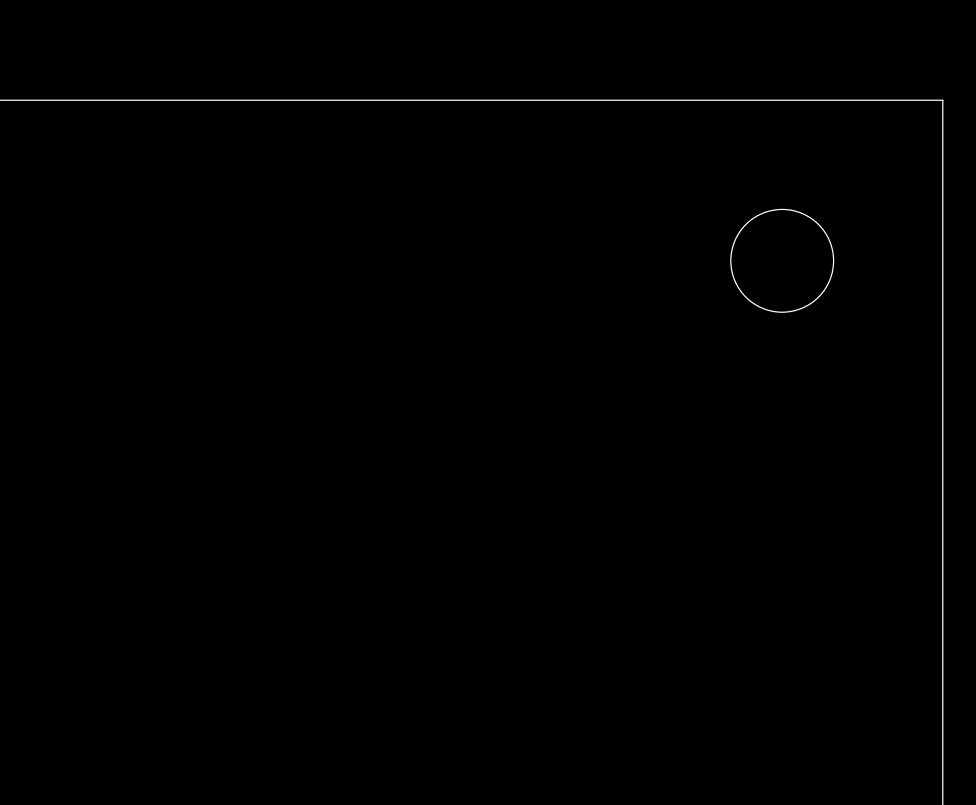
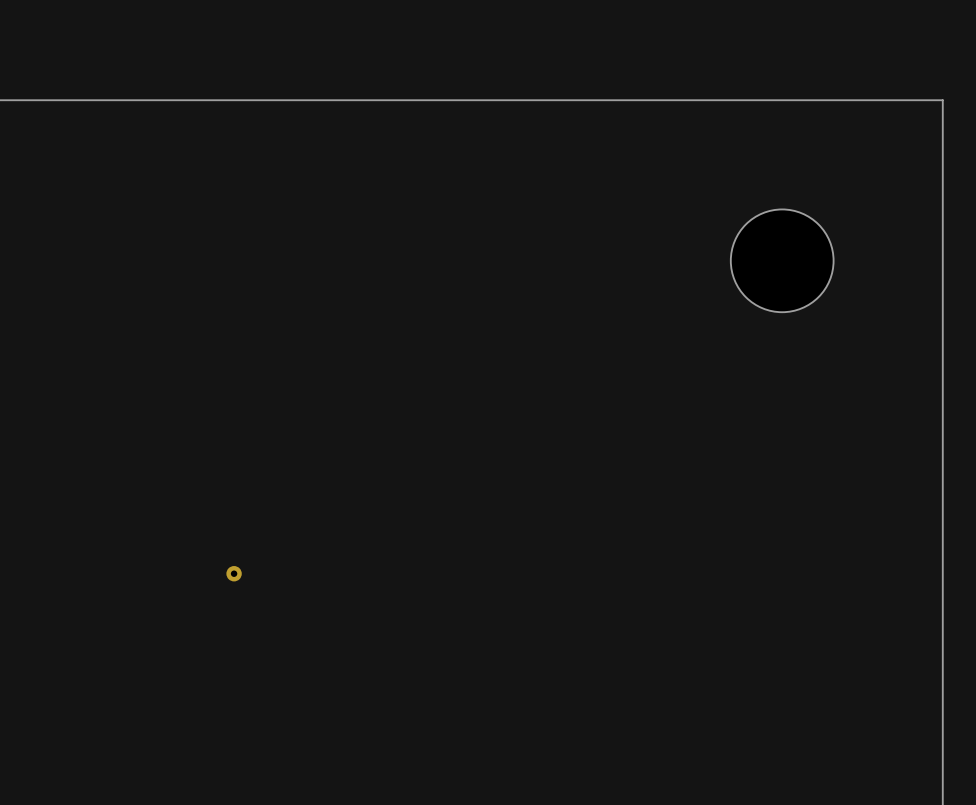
via: none -> (234, 573)

